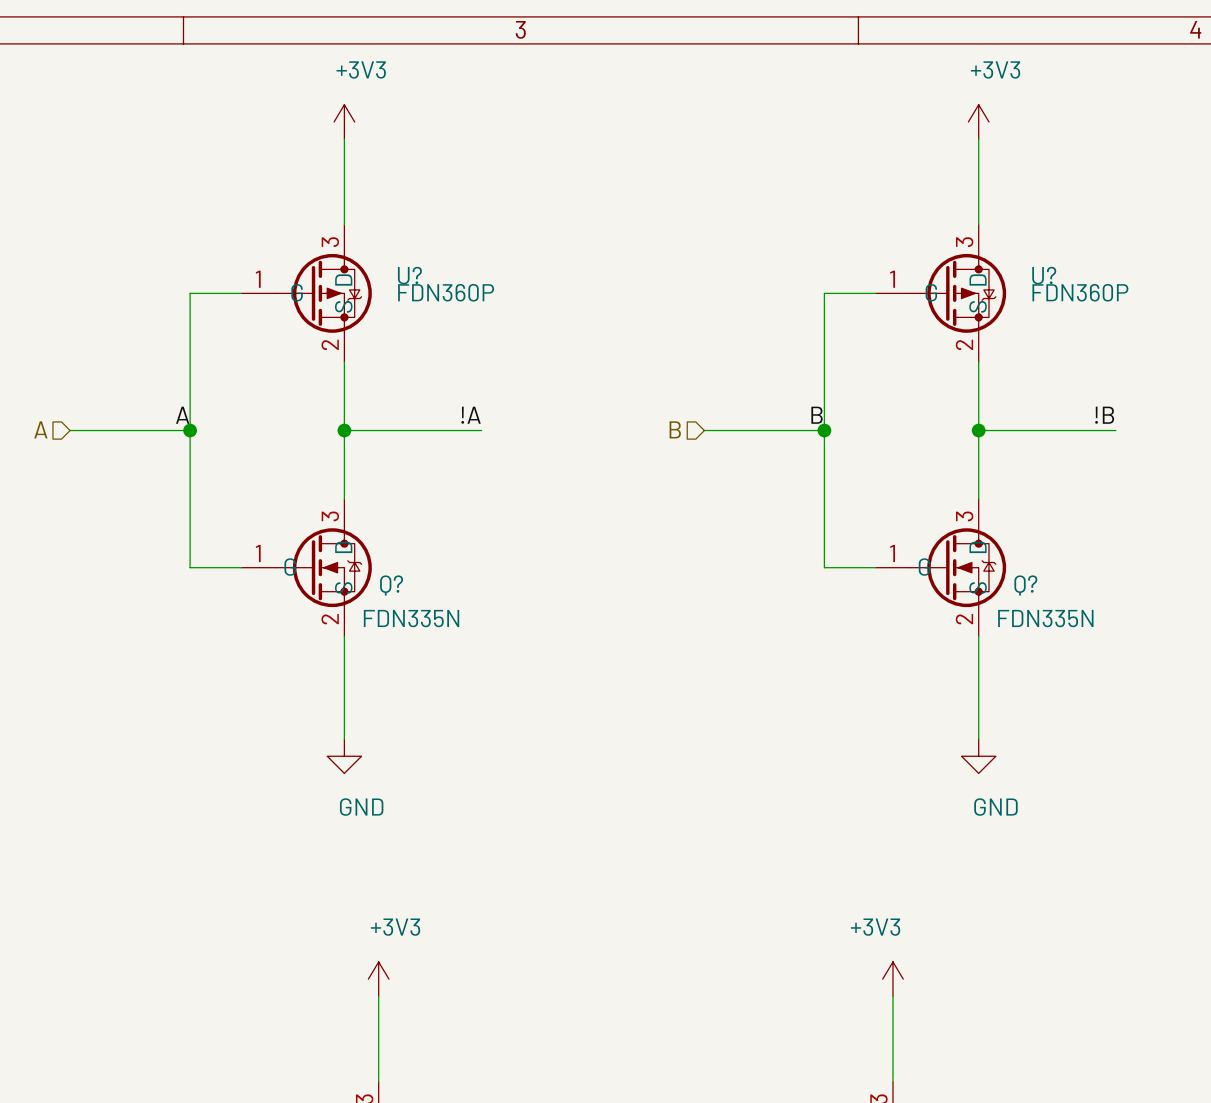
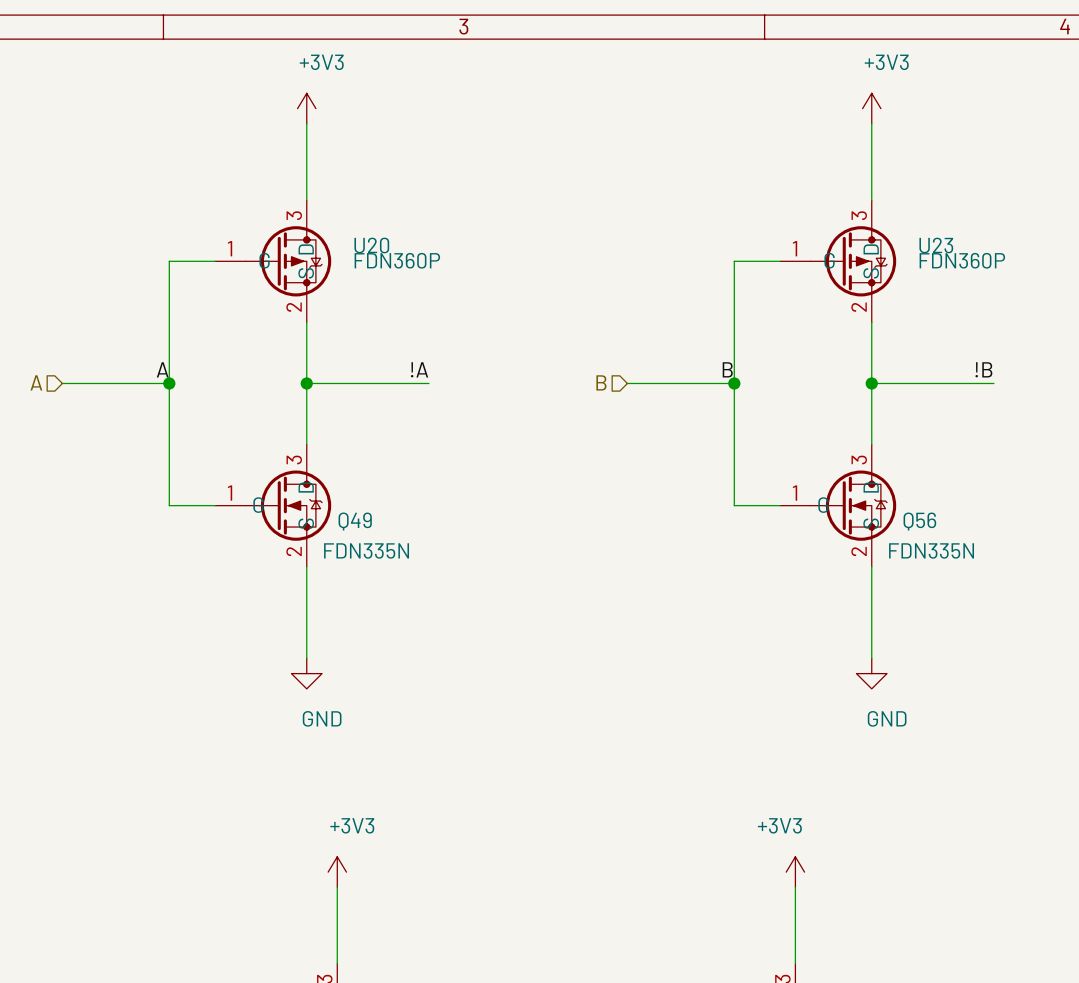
U? name: U? (409, 275) -> U20 (371, 245)
U? name: U? (1044, 275) -> U23 (936, 245)
Q? name: Q? (391, 585) -> Q49 (355, 521)
Q? name: Q? (1025, 585) -> Q56 (919, 521)

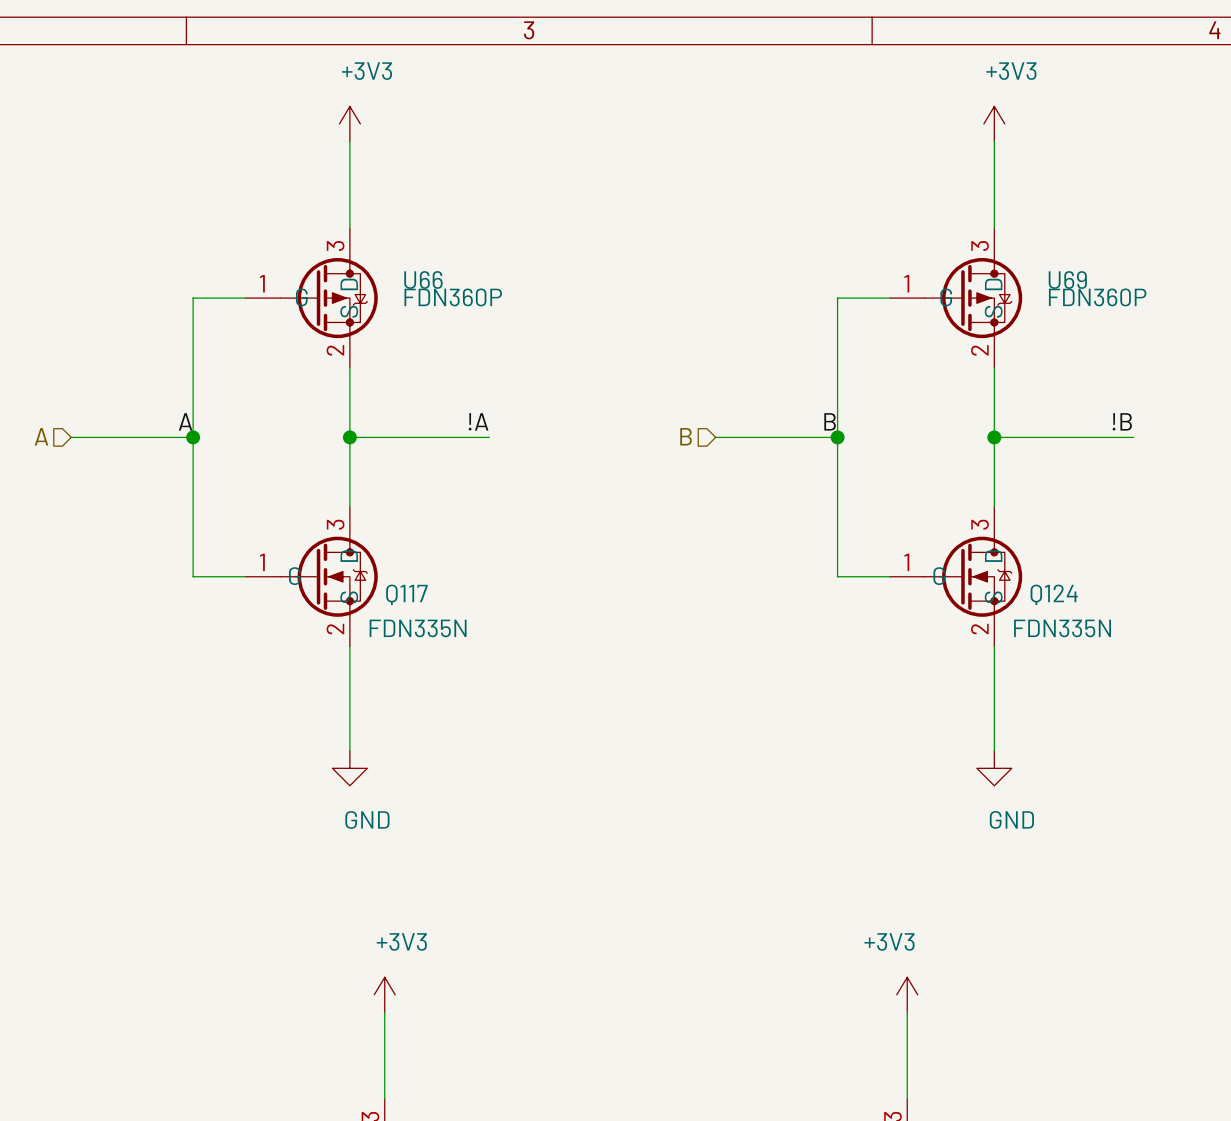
U20 name: U20 (371, 245) -> U66 (423, 280)
U23 name: U23 (936, 245) -> U69 (1067, 280)
Q49 name: Q49 (355, 521) -> Q117 (406, 594)
Q56 name: Q56 (919, 521) -> Q124 (1054, 594)

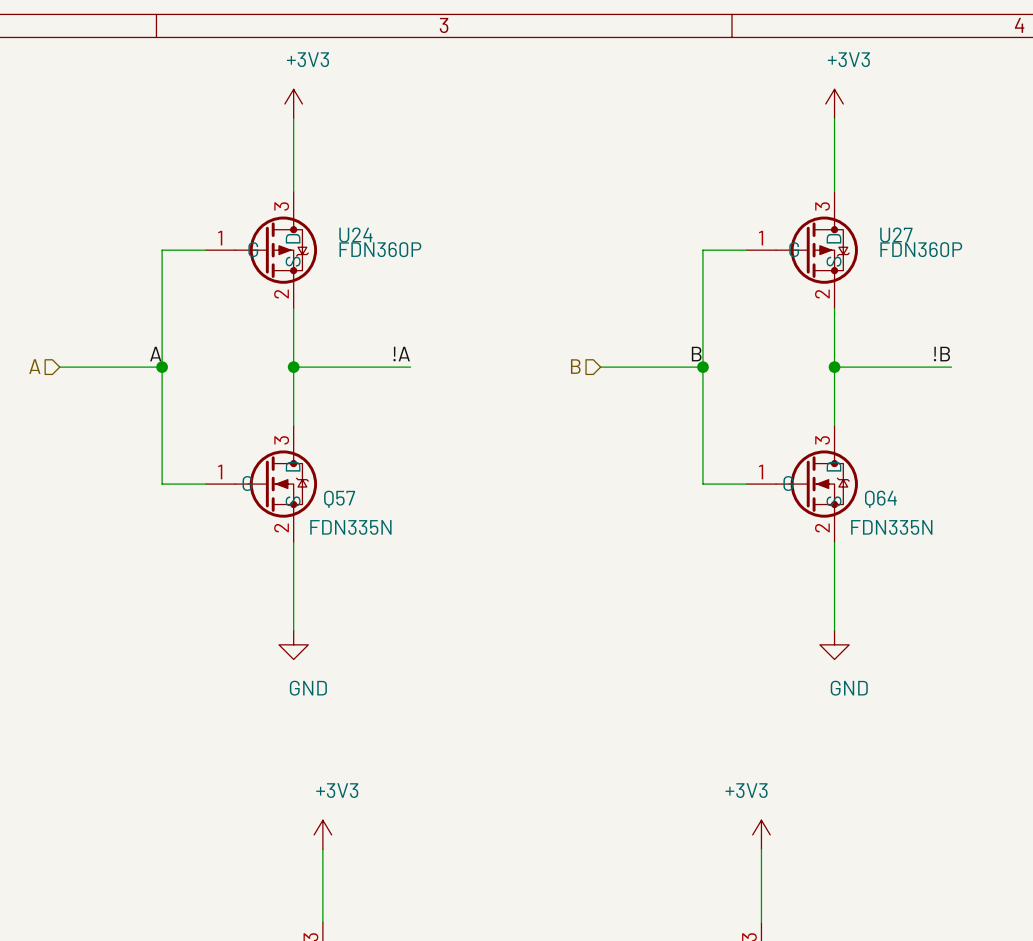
U66 name: U66 (423, 280) -> U24 (355, 235)
U69 name: U69 (1067, 280) -> U27 (896, 235)
Q117 name: Q117 (406, 594) -> Q57 (339, 499)
Q124 name: Q124 (1054, 594) -> Q64 (880, 499)

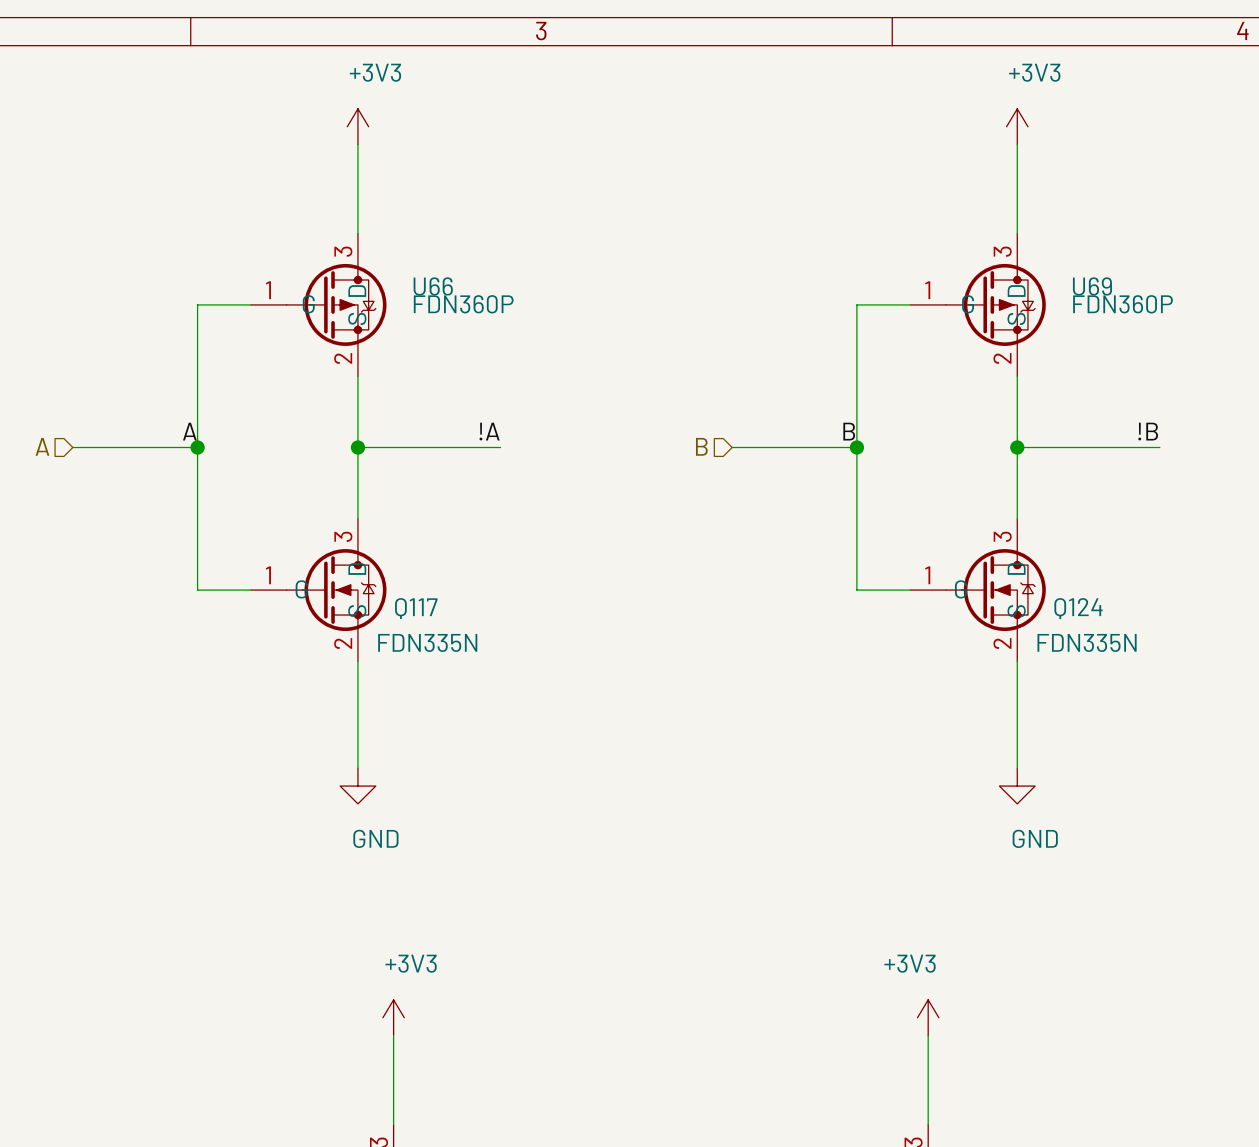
U24 name: U24 (355, 235) -> U66 (433, 286)
U27 name: U27 (896, 235) -> U69 (1092, 286)
Q57 name: Q57 (339, 499) -> Q117 (416, 608)
Q64 name: Q64 (880, 499) -> Q124 (1078, 608)

